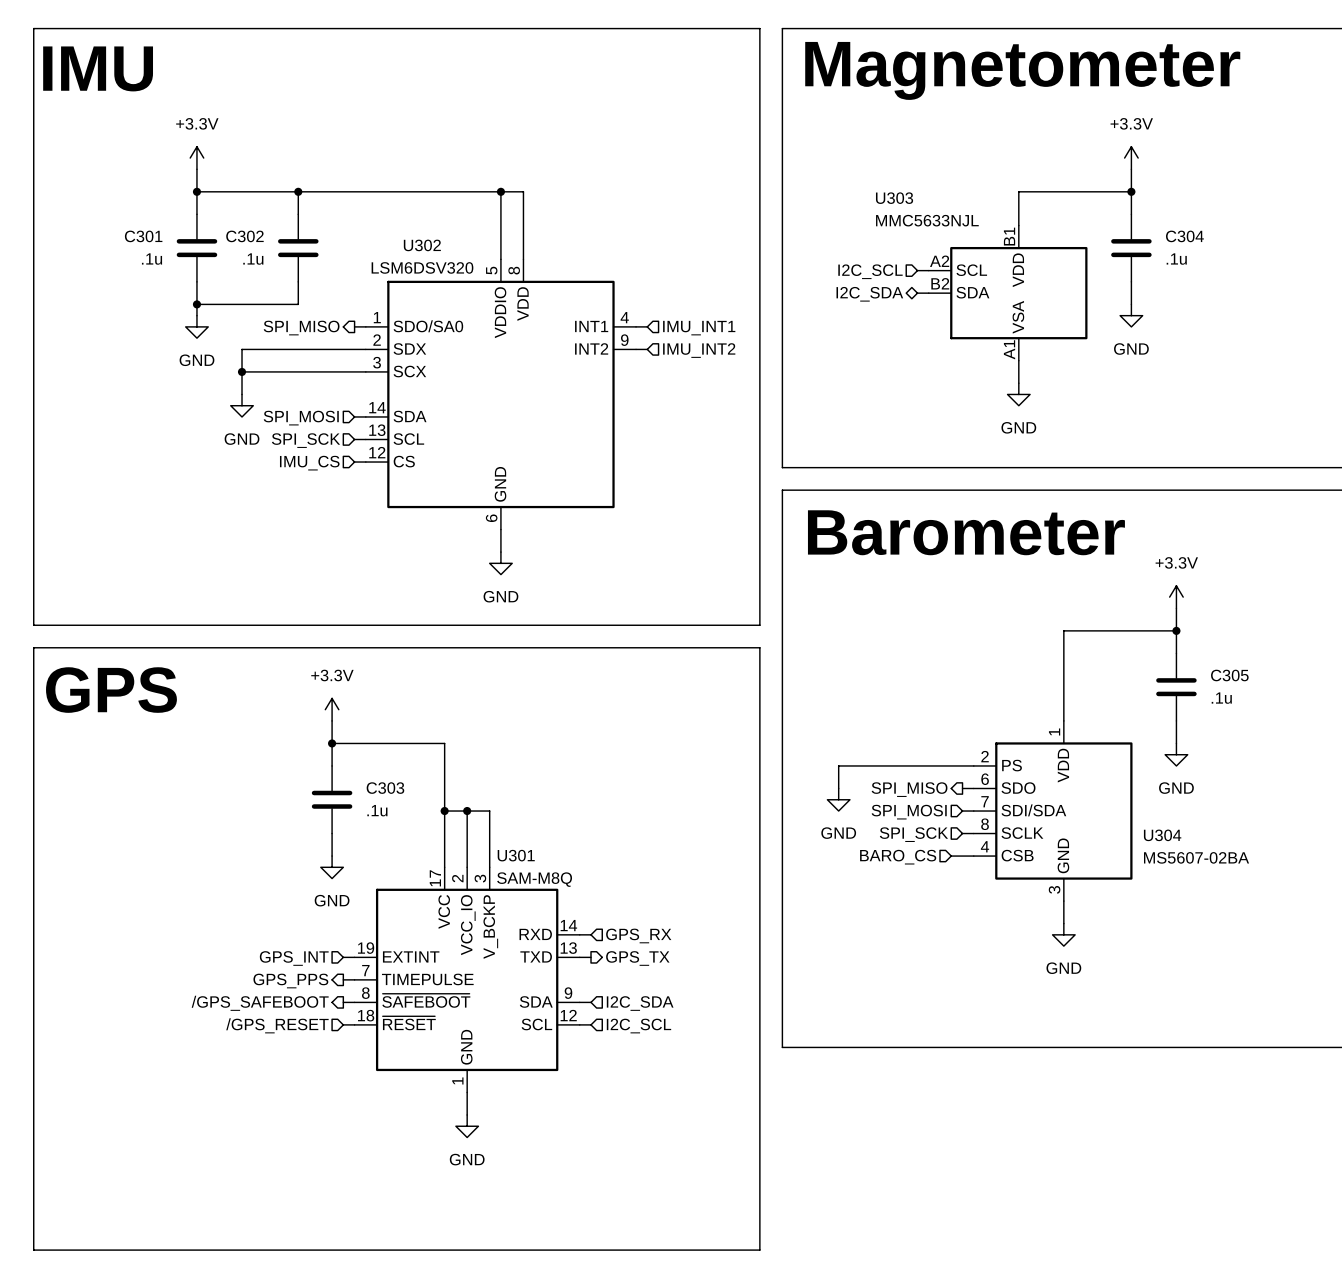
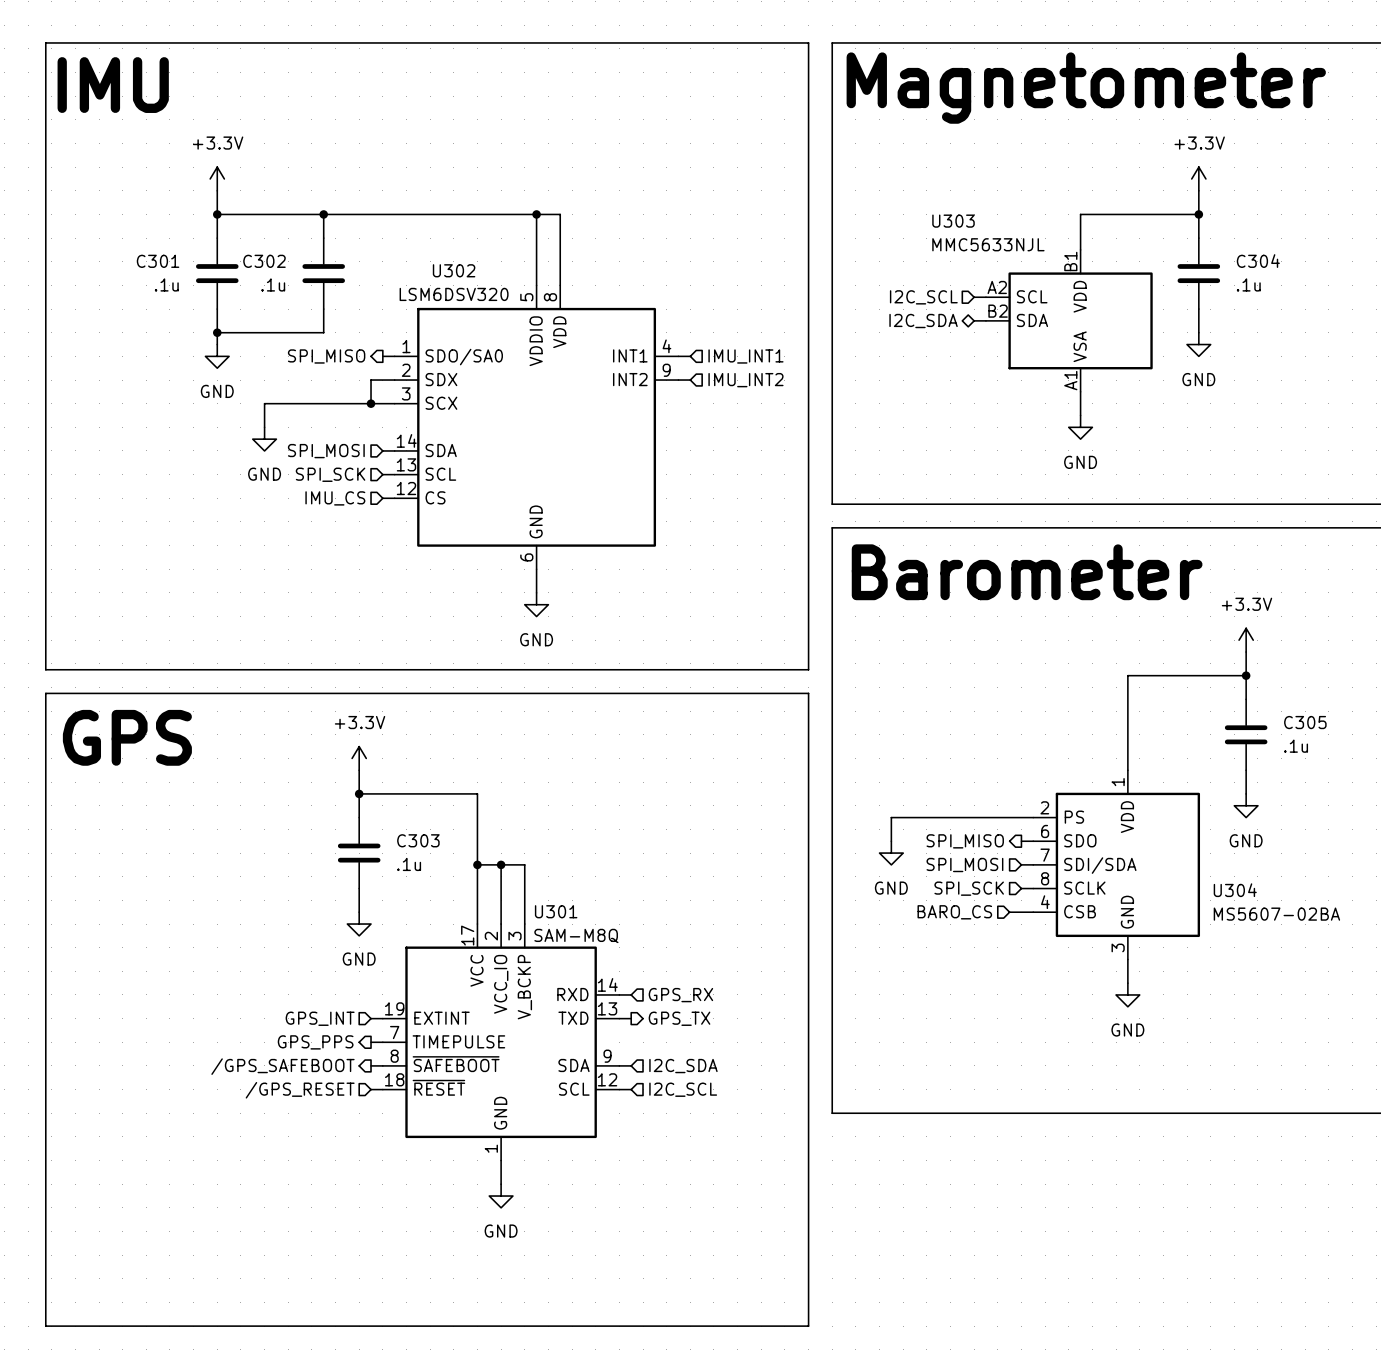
wire: (343, 349) (242, 349) (242, 371) -> (371, 380) (371, 403)
junction: (242, 371) -> none
junction: none -> (371, 403)

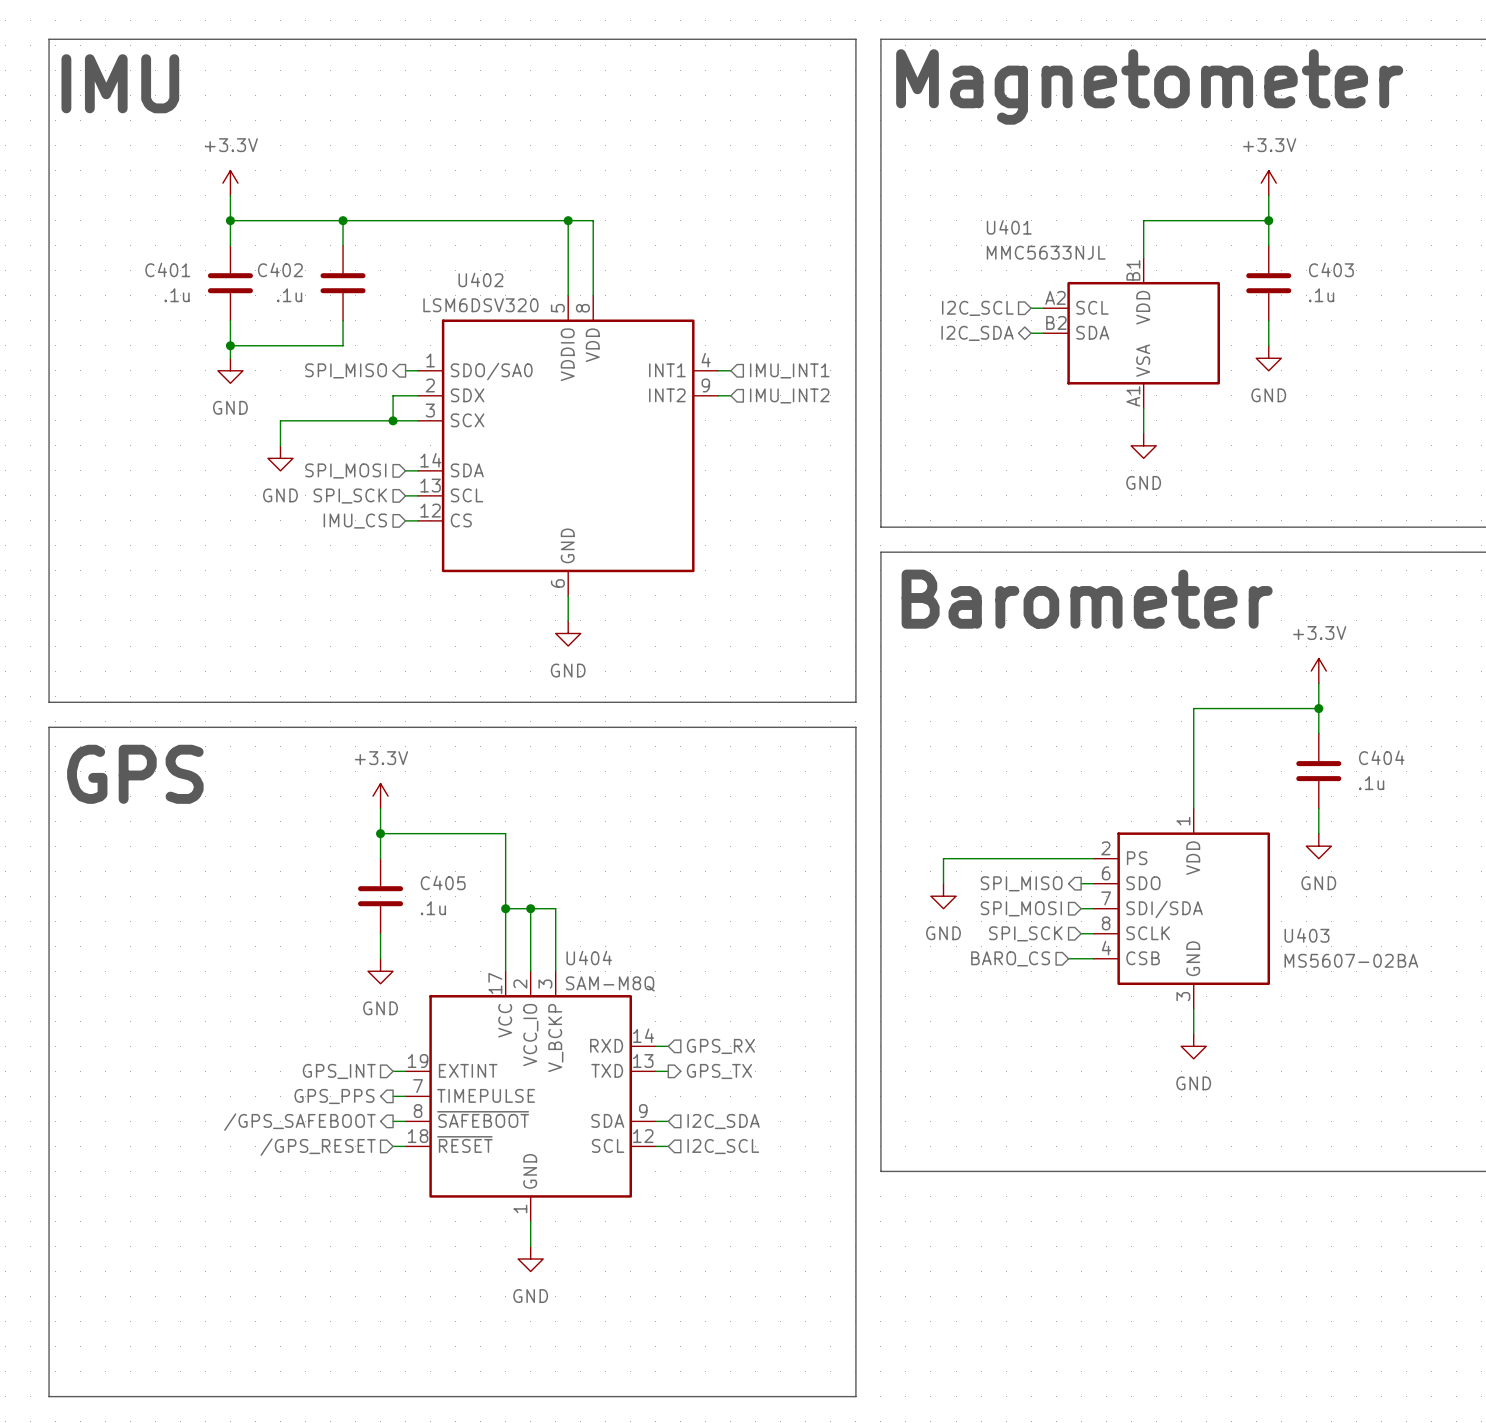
U303 name: U303 (953, 221) -> U401 (1009, 227)
C301 name: C301 (158, 261) -> C401 (167, 269)
C302 name: C302 (264, 261) -> C402 (280, 269)
C304 name: C304 (1258, 261) -> C403 (1331, 269)
U302 name: U302 (454, 270) -> U402 (480, 279)
C305 name: C305 (1305, 722) -> C404 (1381, 757)
C303 name: C303 (418, 840) -> C405 (443, 882)
U304 name: U304 (1235, 890) -> U403 (1306, 935)
U301 name: U301 (556, 911) -> U404 (589, 957)

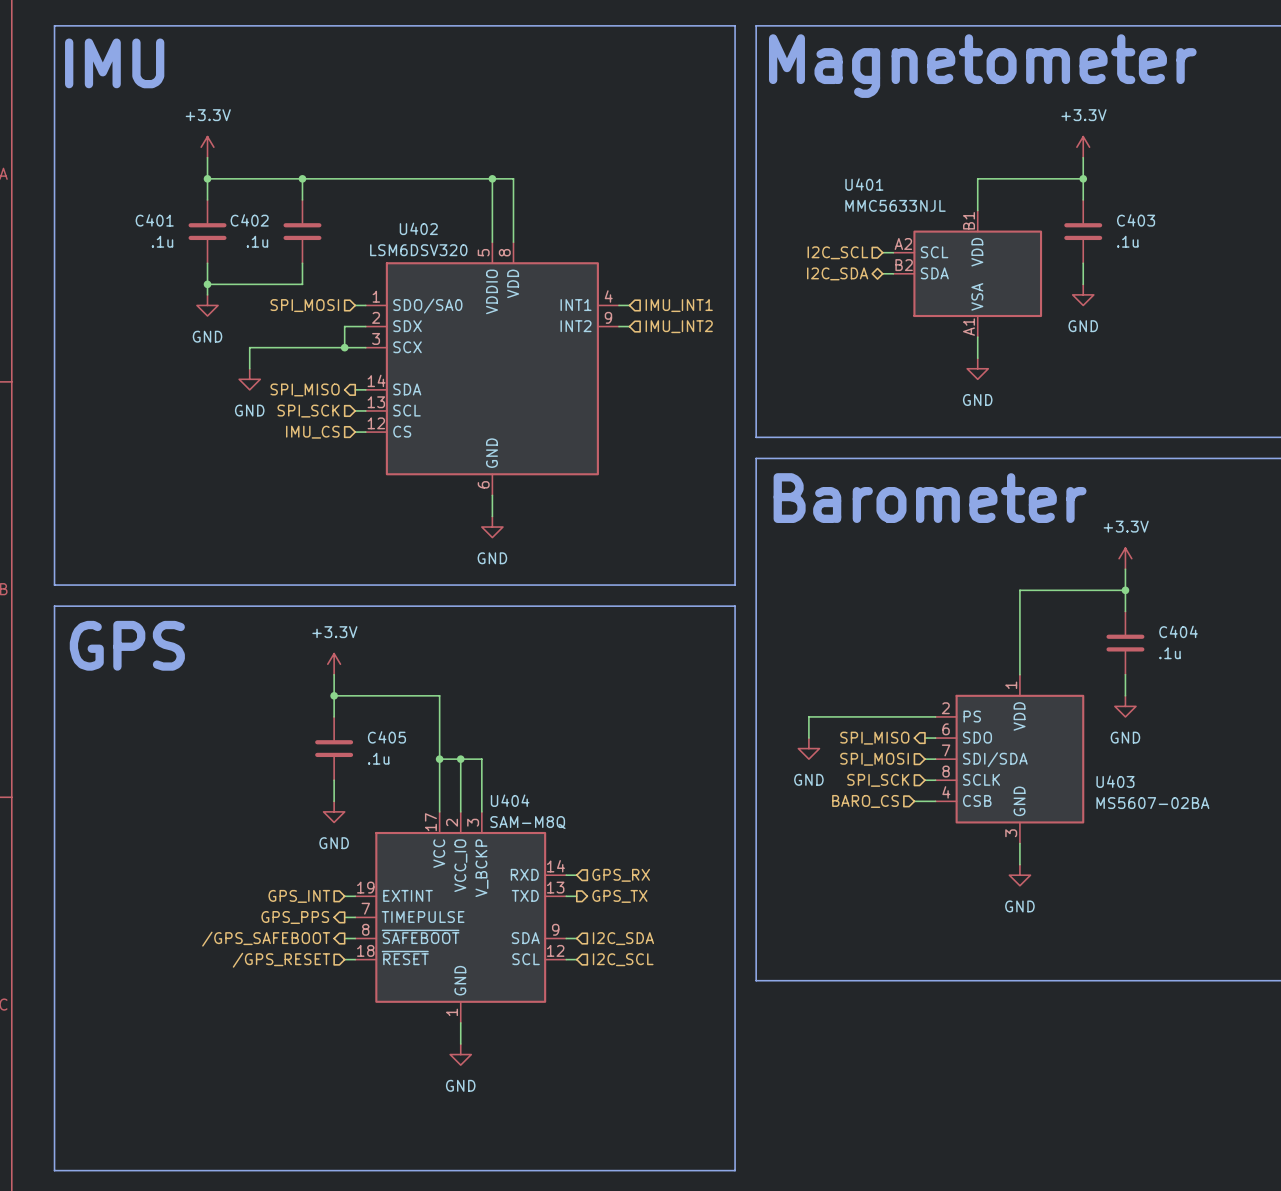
hierarchical label shape: output (346, 370) -> input (304, 305)
hierarchical label: SPI_MISO (346, 370) -> SPI_MOSI (304, 305)
hierarchical label shape: input (345, 470) -> output (305, 389)
hierarchical label: SPI_MOSI (345, 470) -> SPI_MISO (305, 389)

